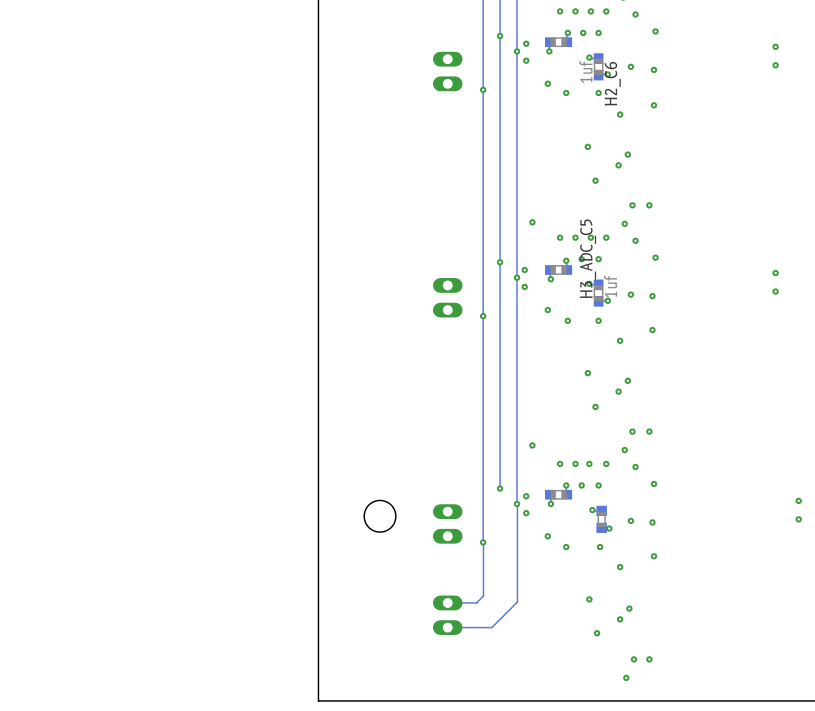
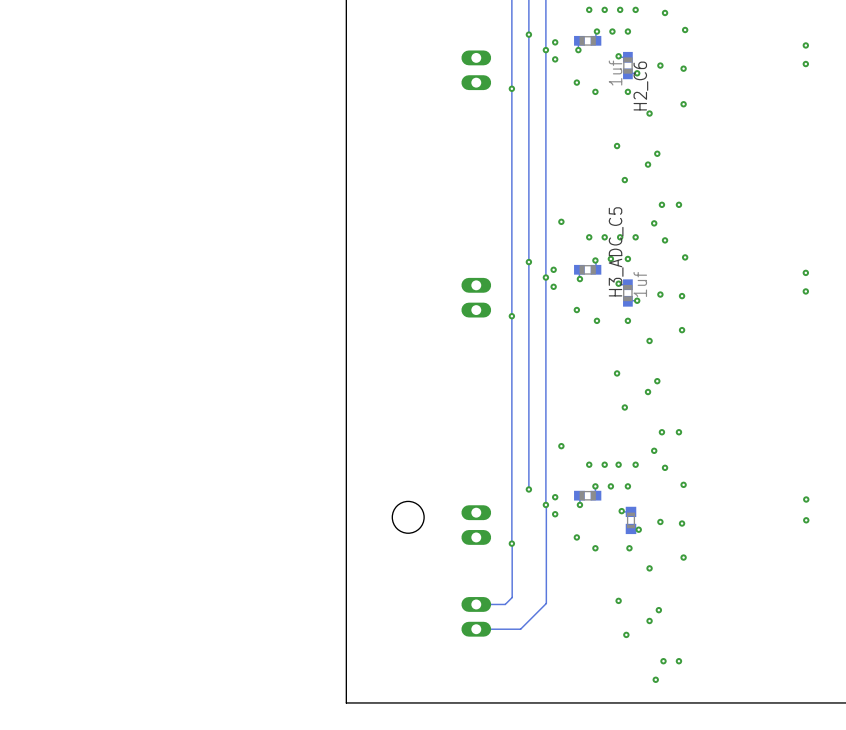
via: none -> (806, 499)
via: (798, 500) -> none
via: none -> (806, 520)
via: (798, 519) -> none

